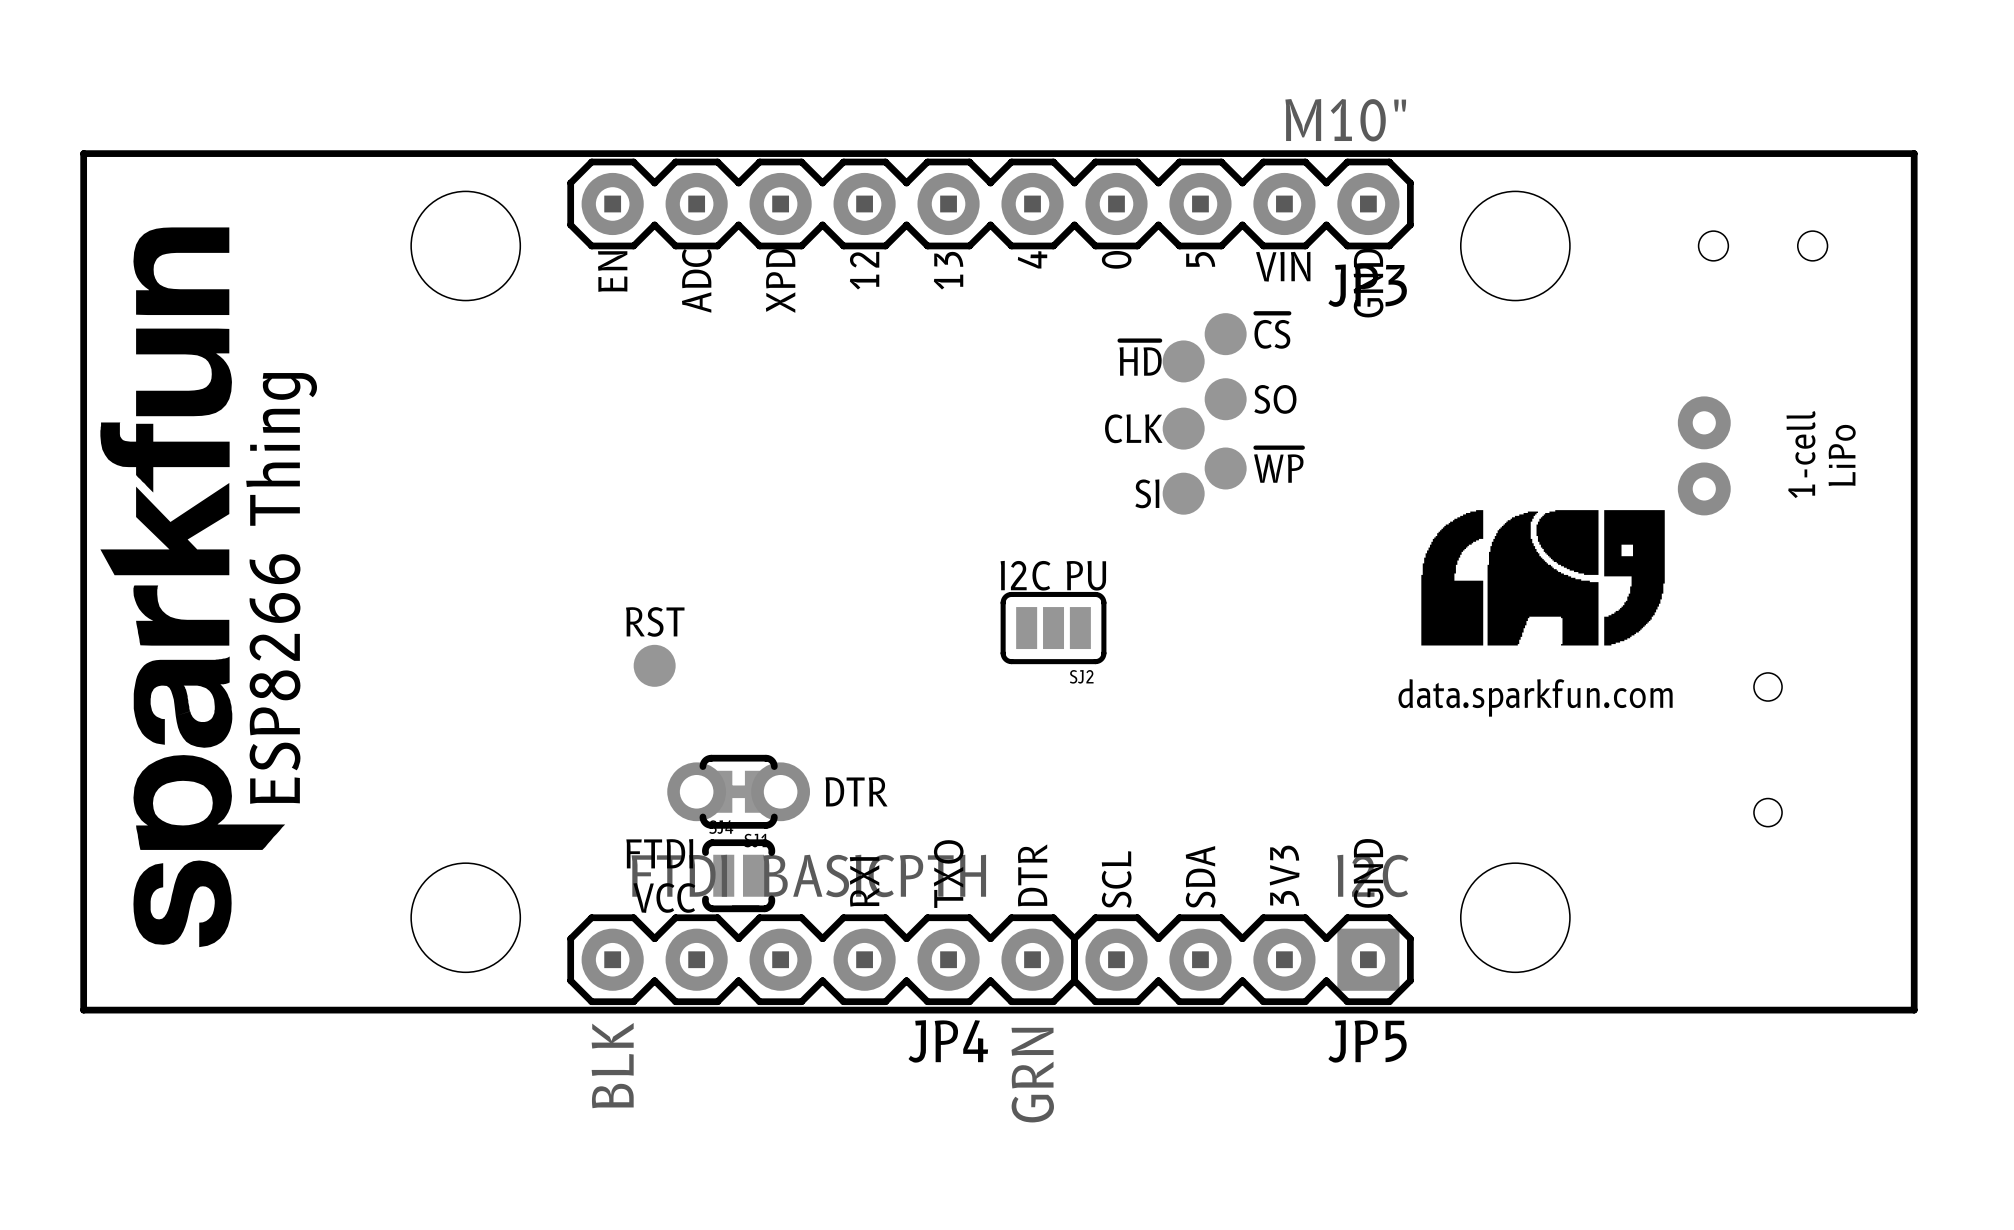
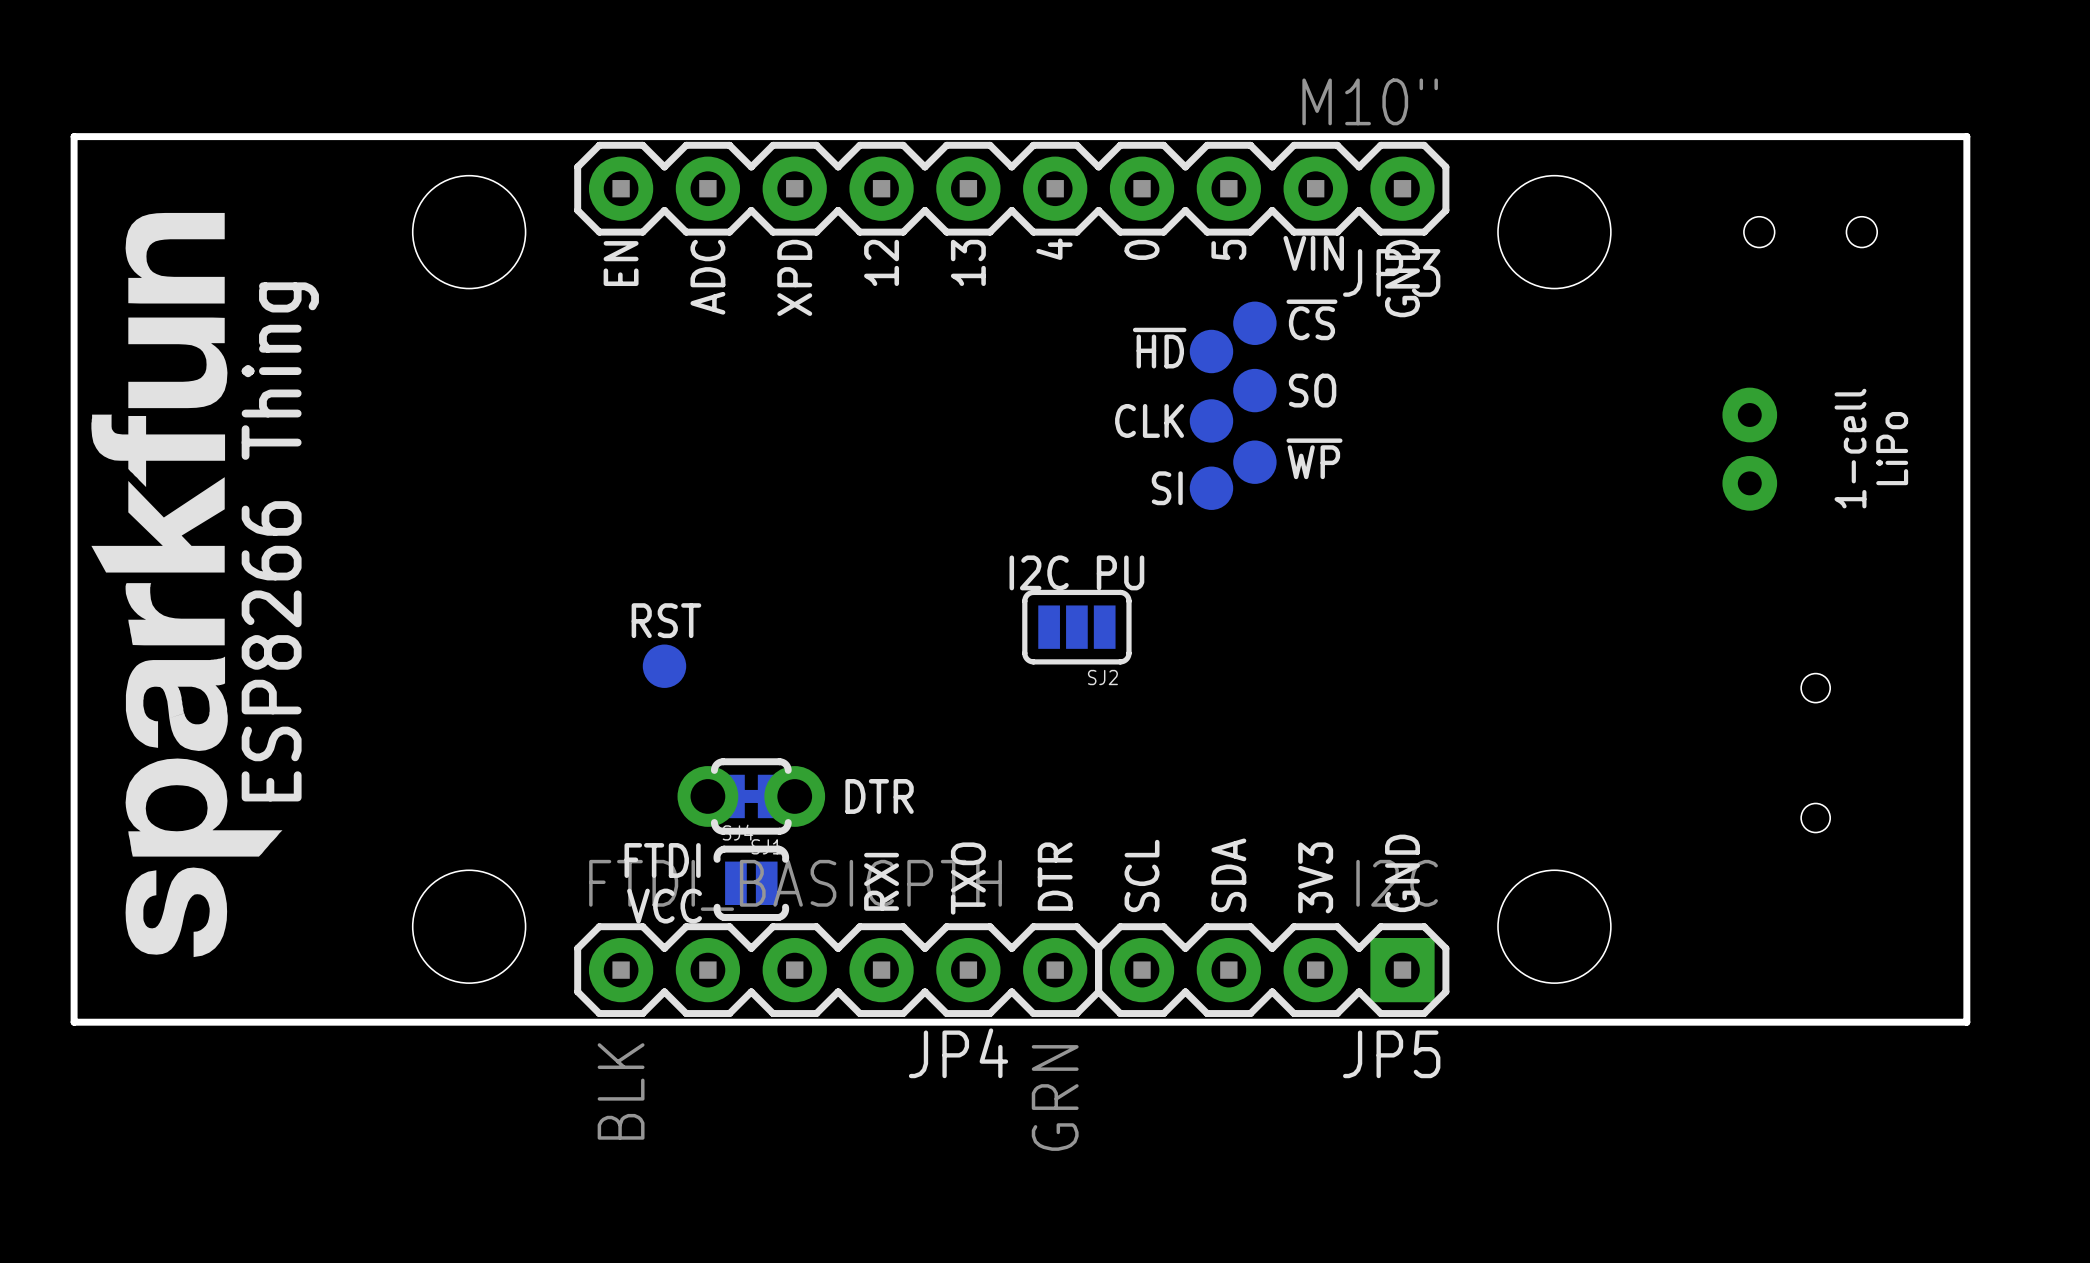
drawing: [1421, 510, 1665, 646] -> none
text: data.sparkfun.com (1535, 697) -> none

